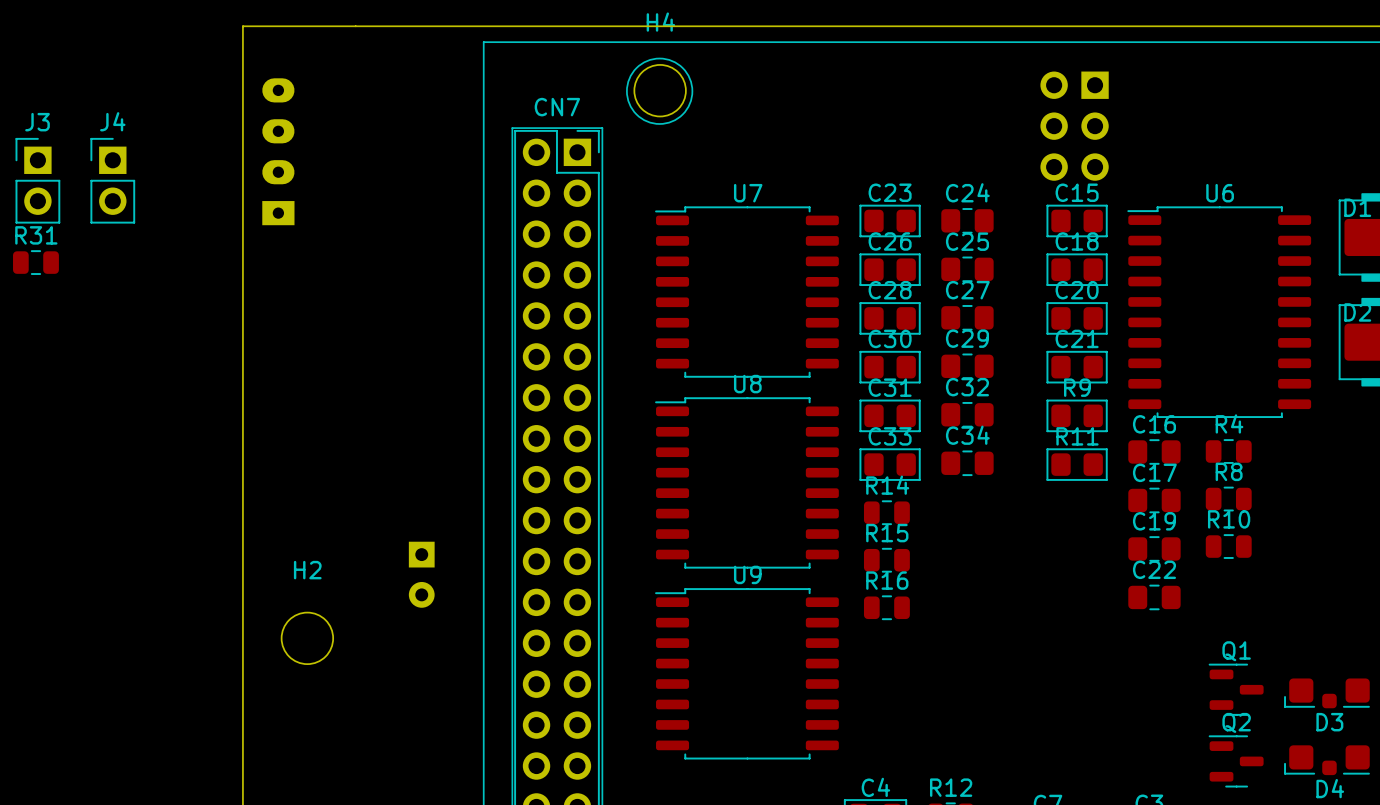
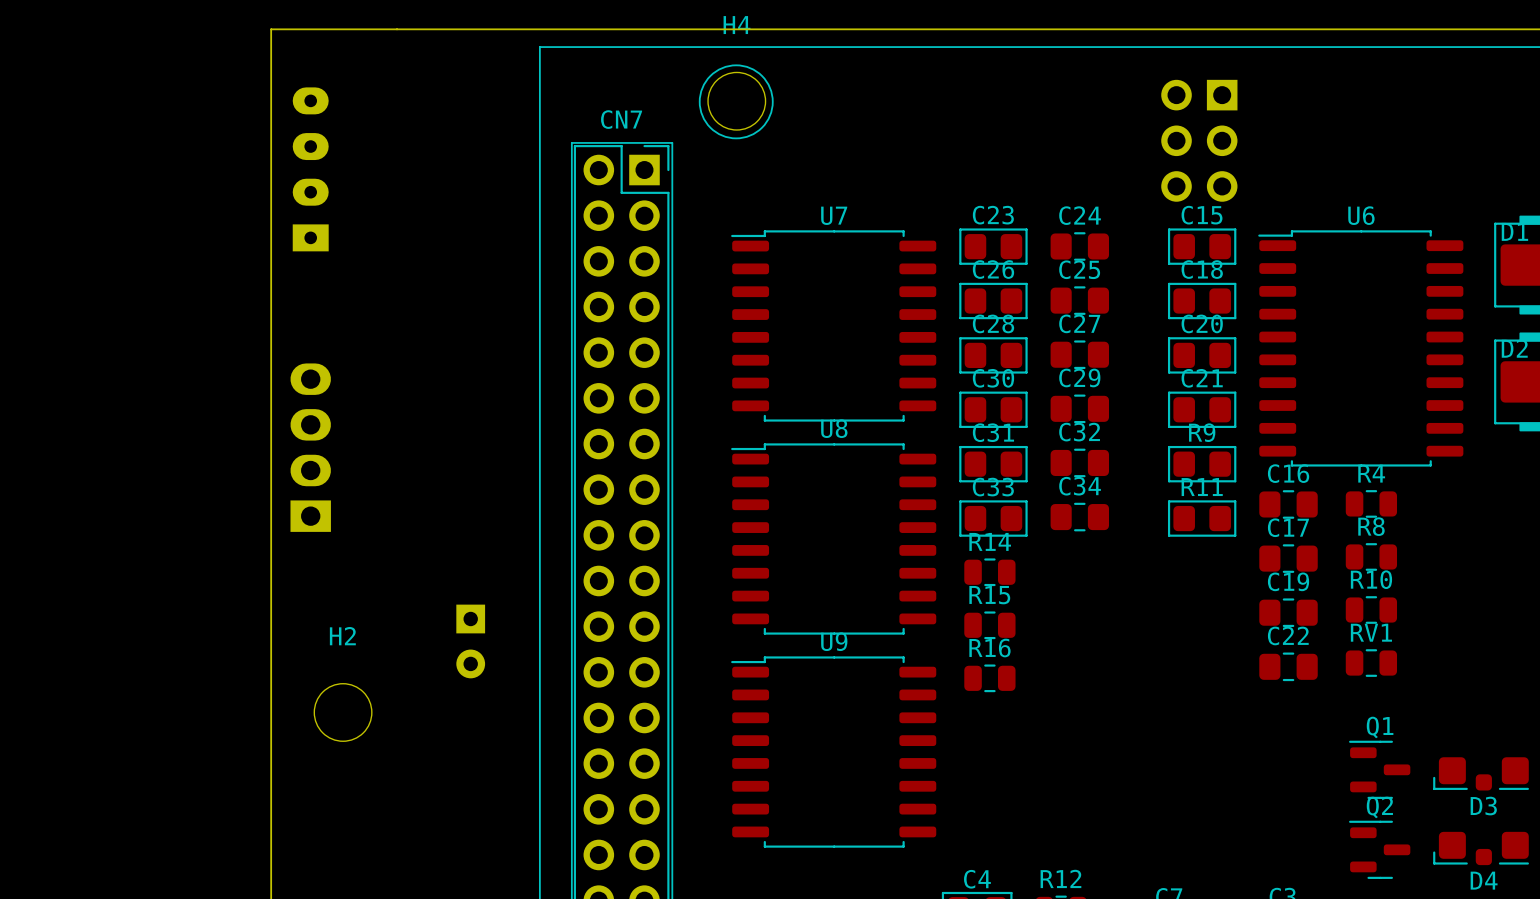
J3: (37, 180) -> none
J4: (112, 180) -> none
R31: (35, 262) -> none
part: none -> (310, 447)
RV1: none -> (1371, 663)

